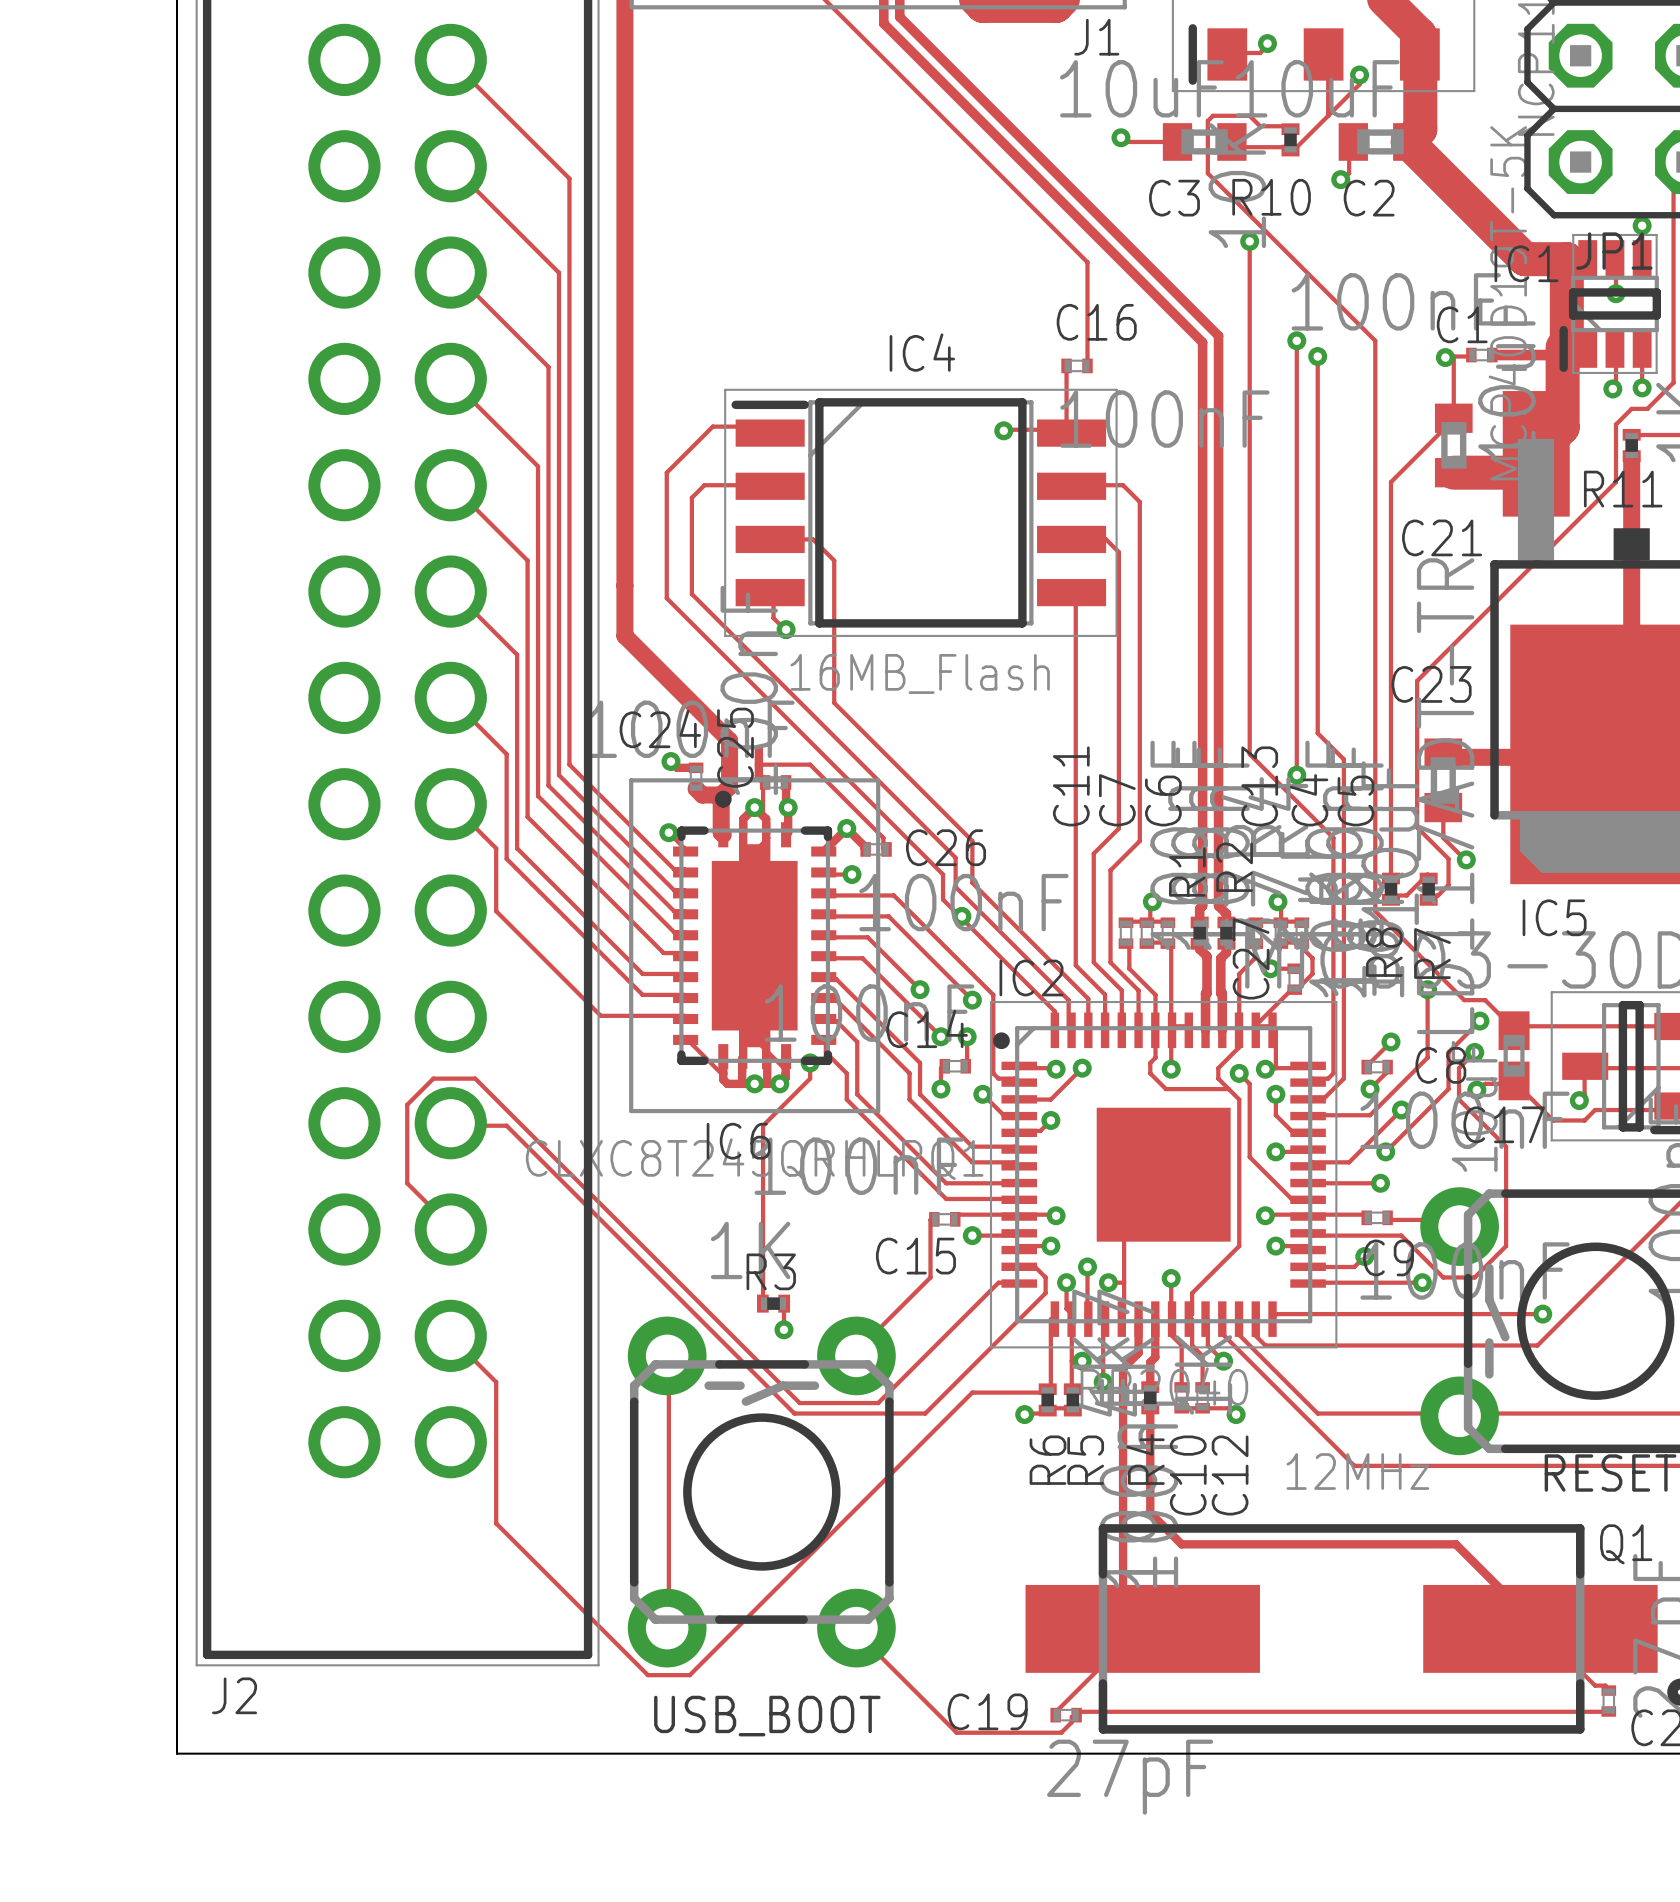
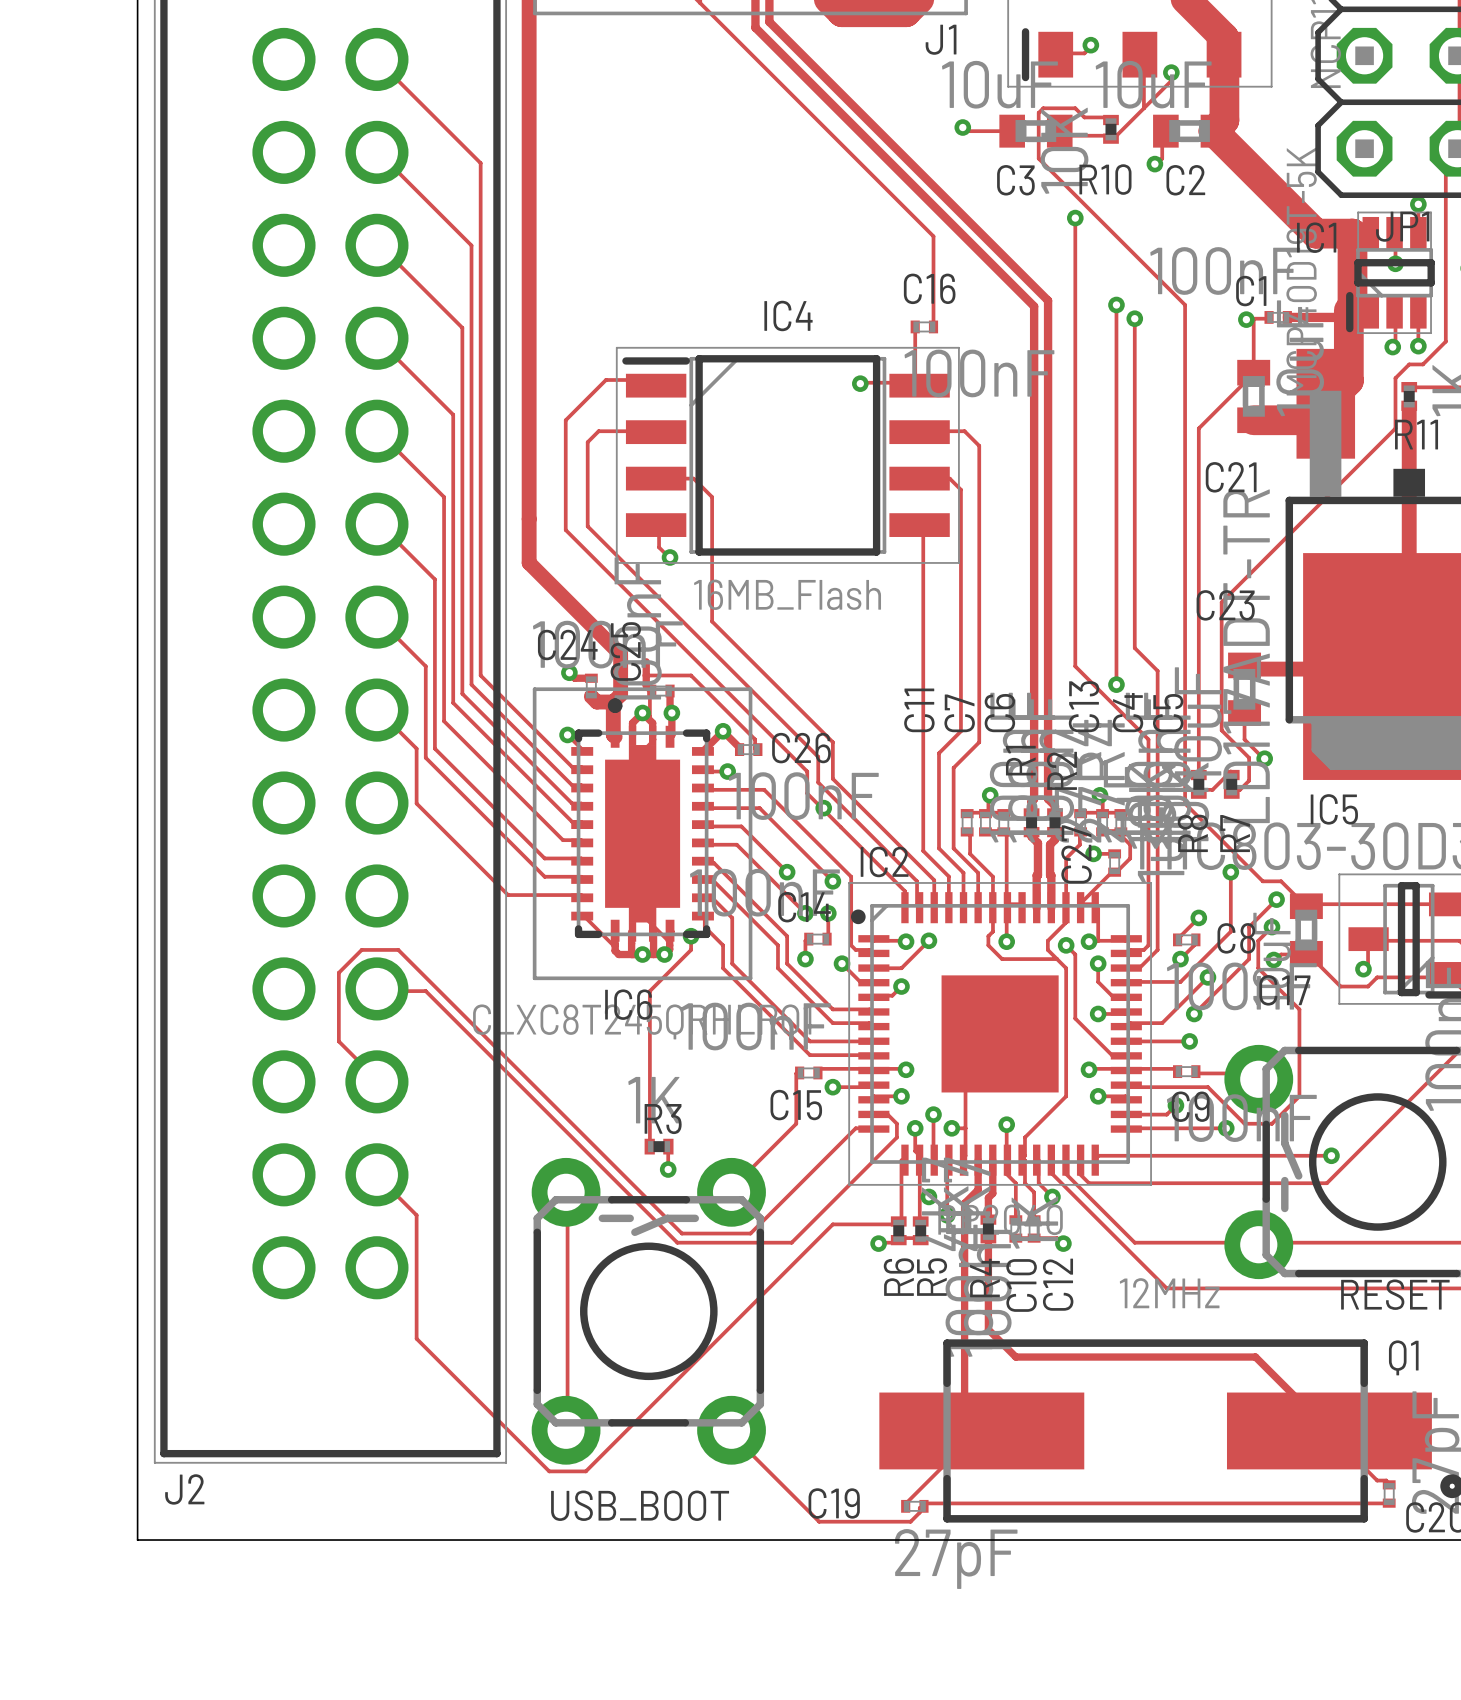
C17 footprint: [1498, 1011, 1530, 1101] -> [1289, 893, 1323, 967]

